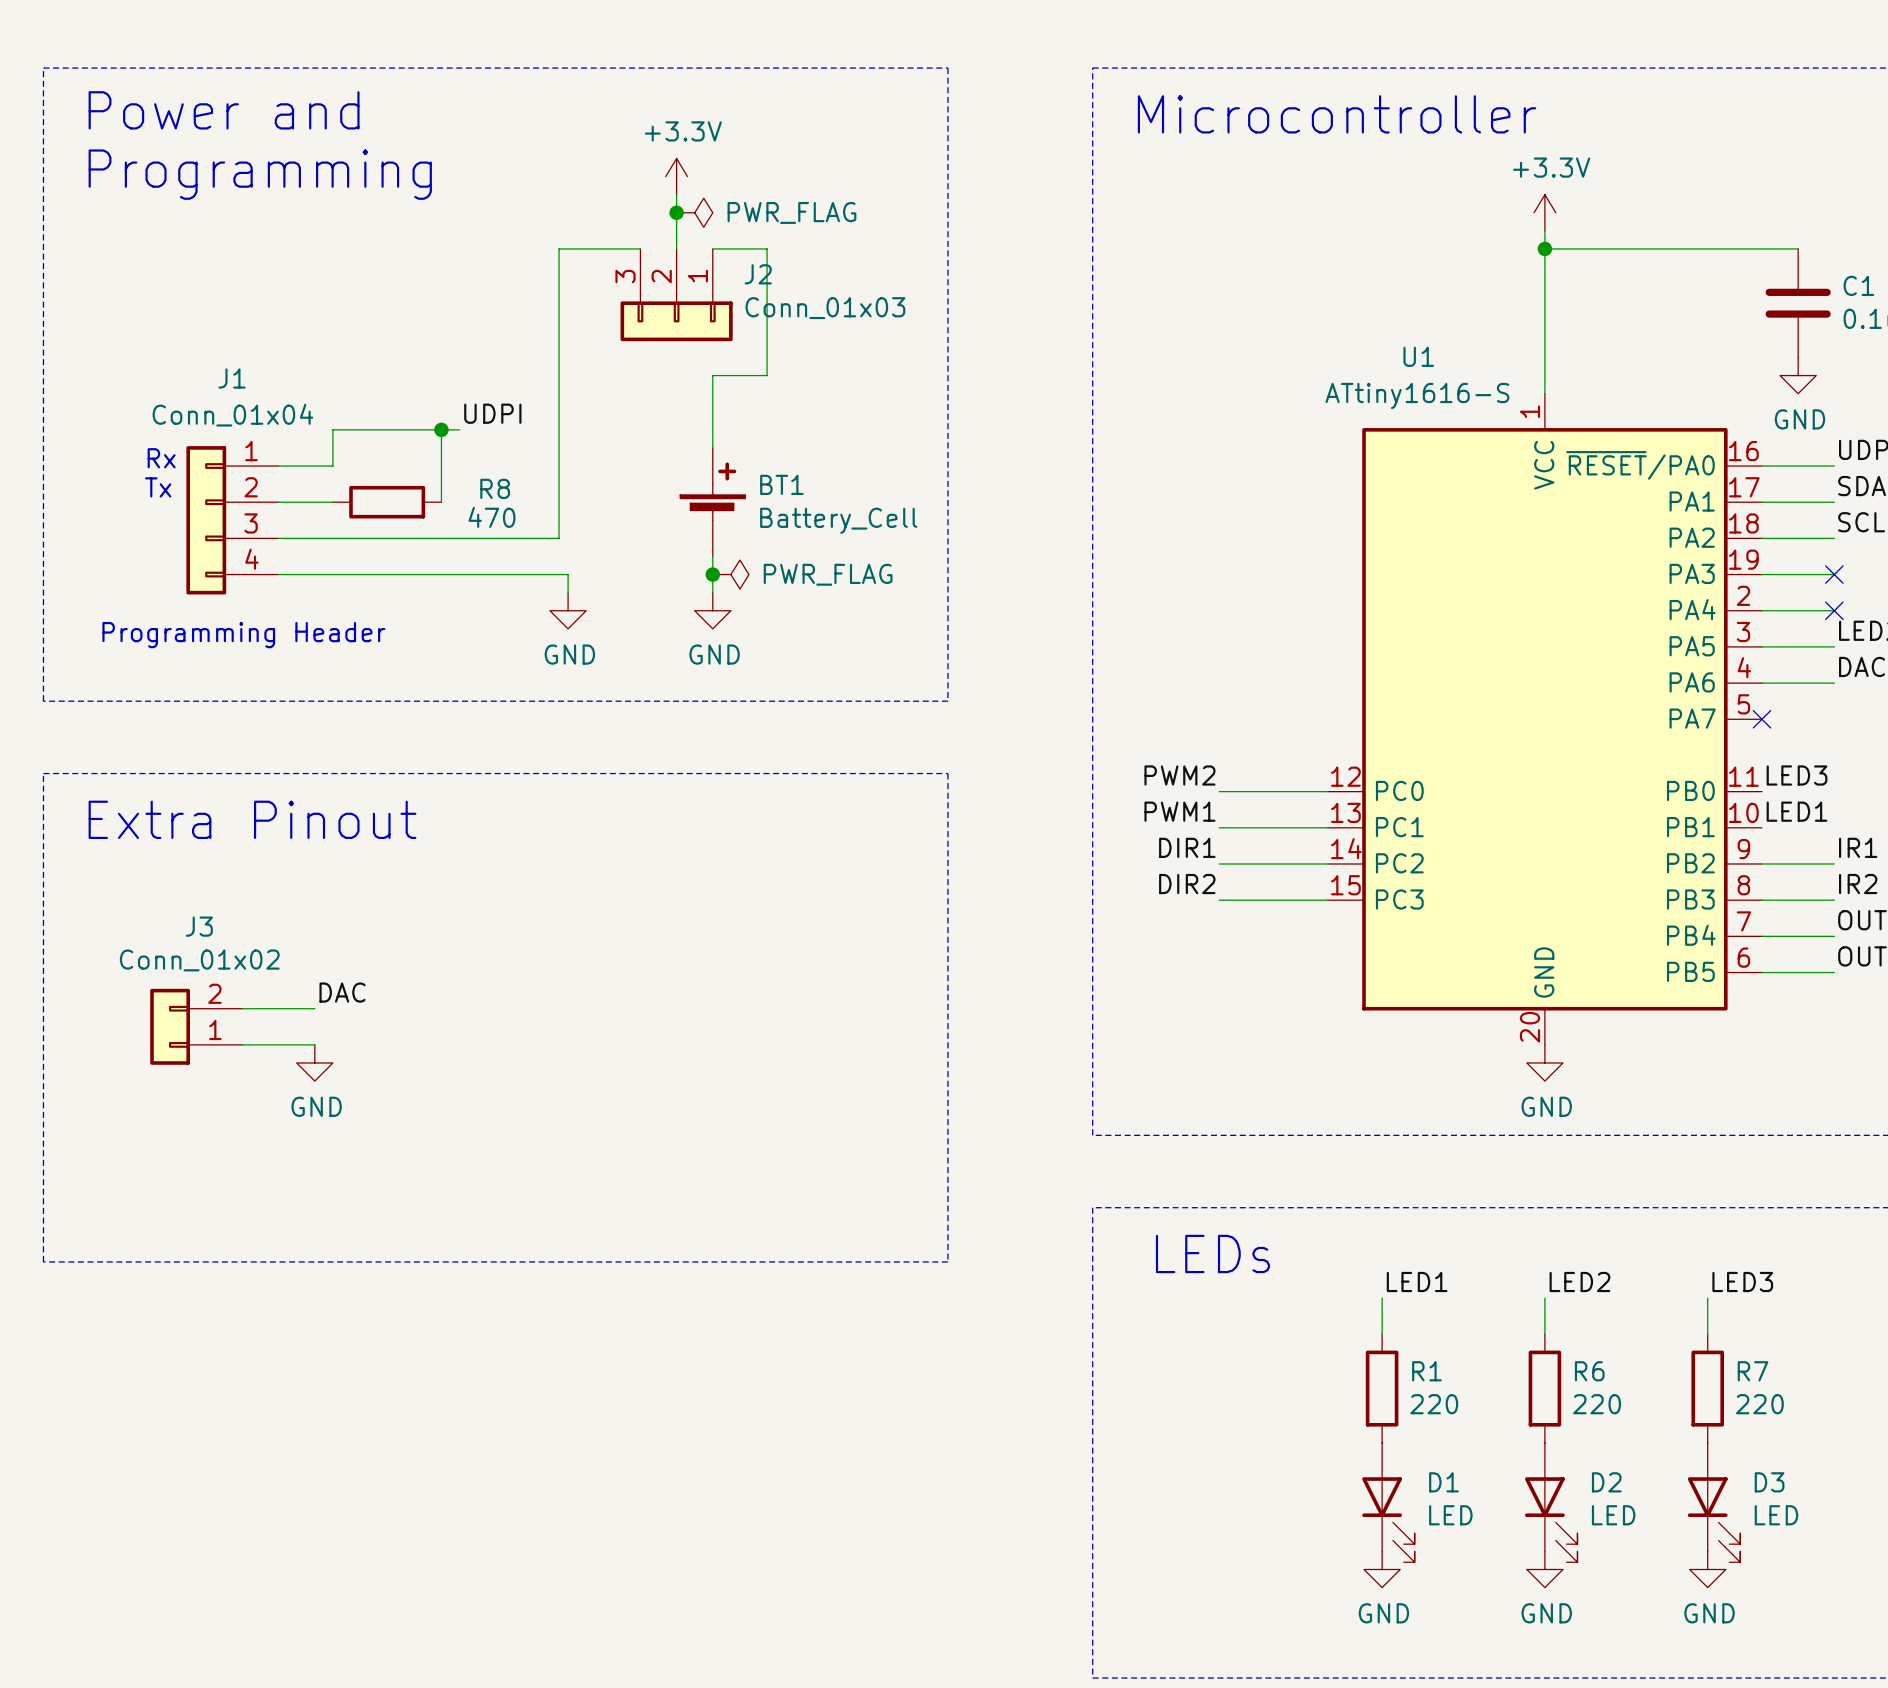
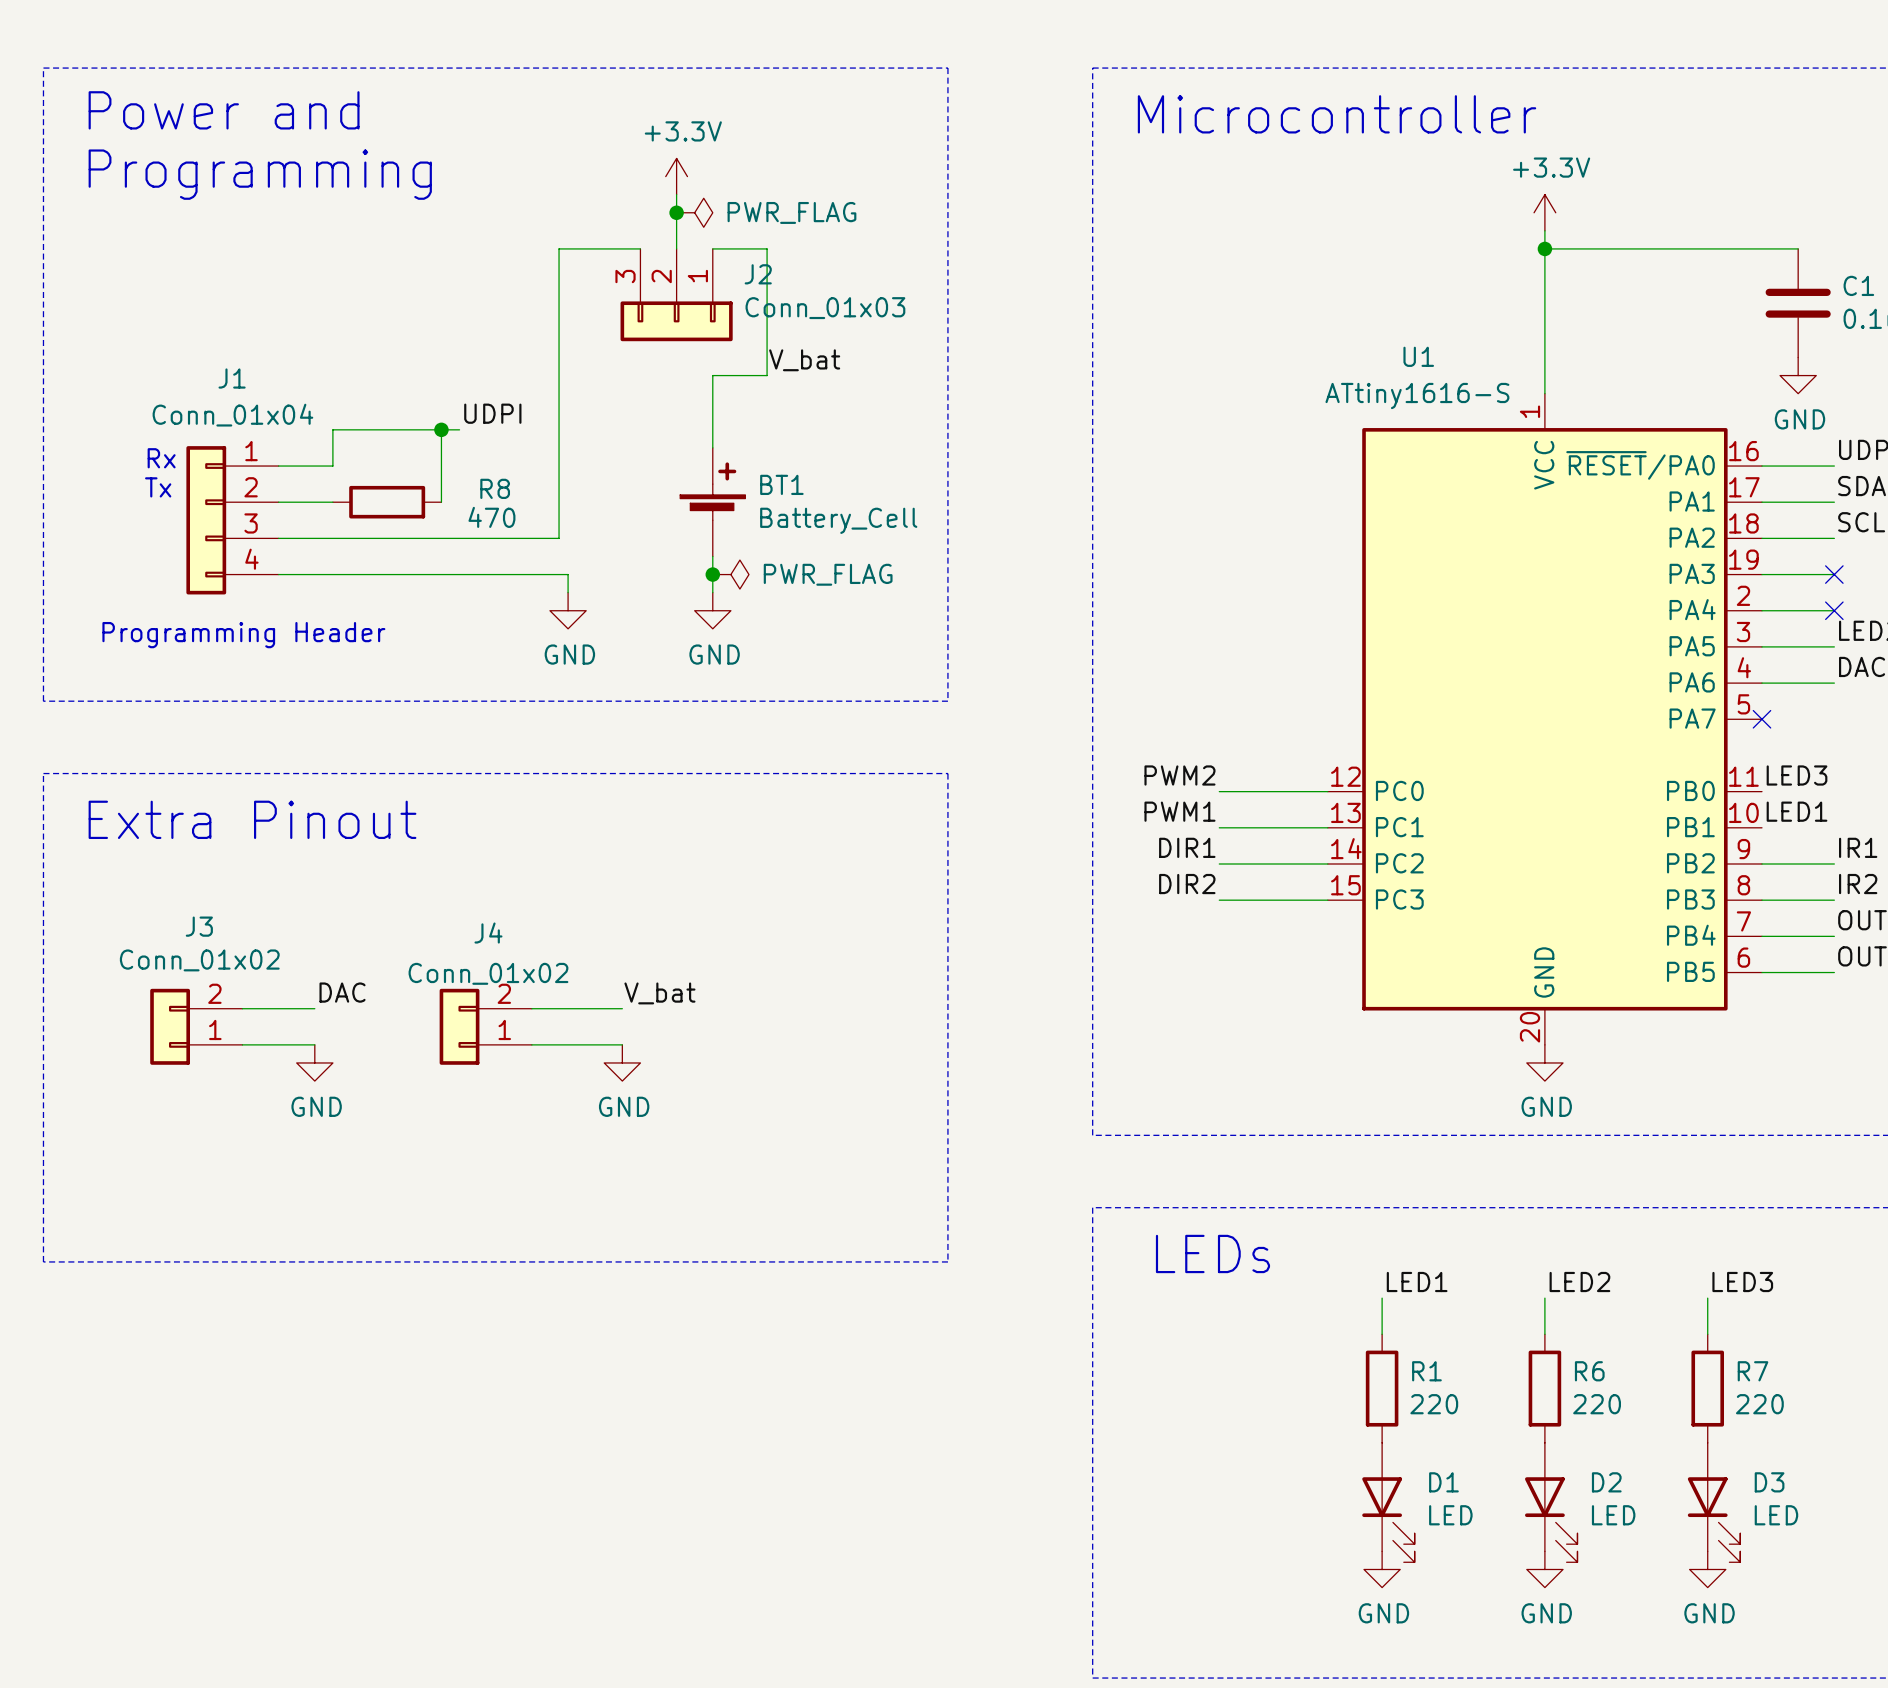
label: none -> V_bat (804, 360)
label: none -> V_bat (659, 993)
wire: none -> (531, 1008) (622, 1008)
J4: none -> Conn_01x02 (485, 1026)
wire: none -> (531, 1044) (622, 1044)
power symbol: none -> GND (622, 1062)

